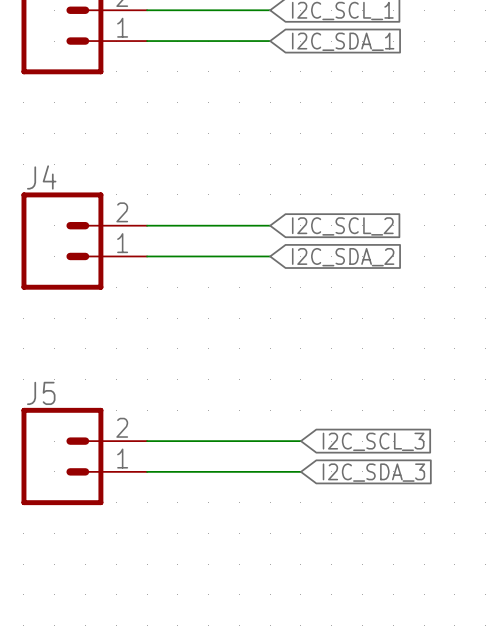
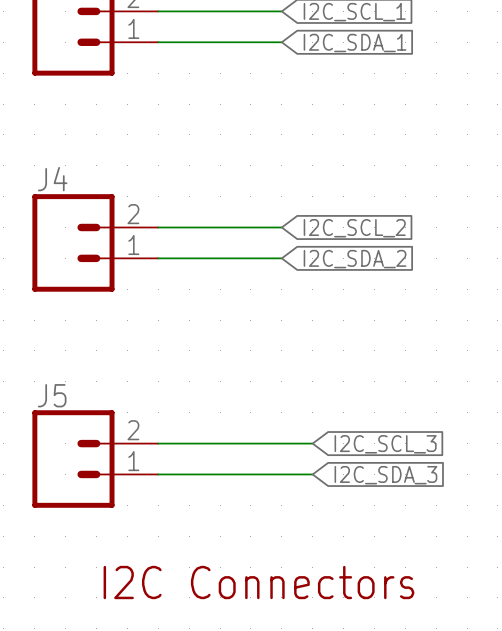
text: none -> I2C Connectors (258, 582)

